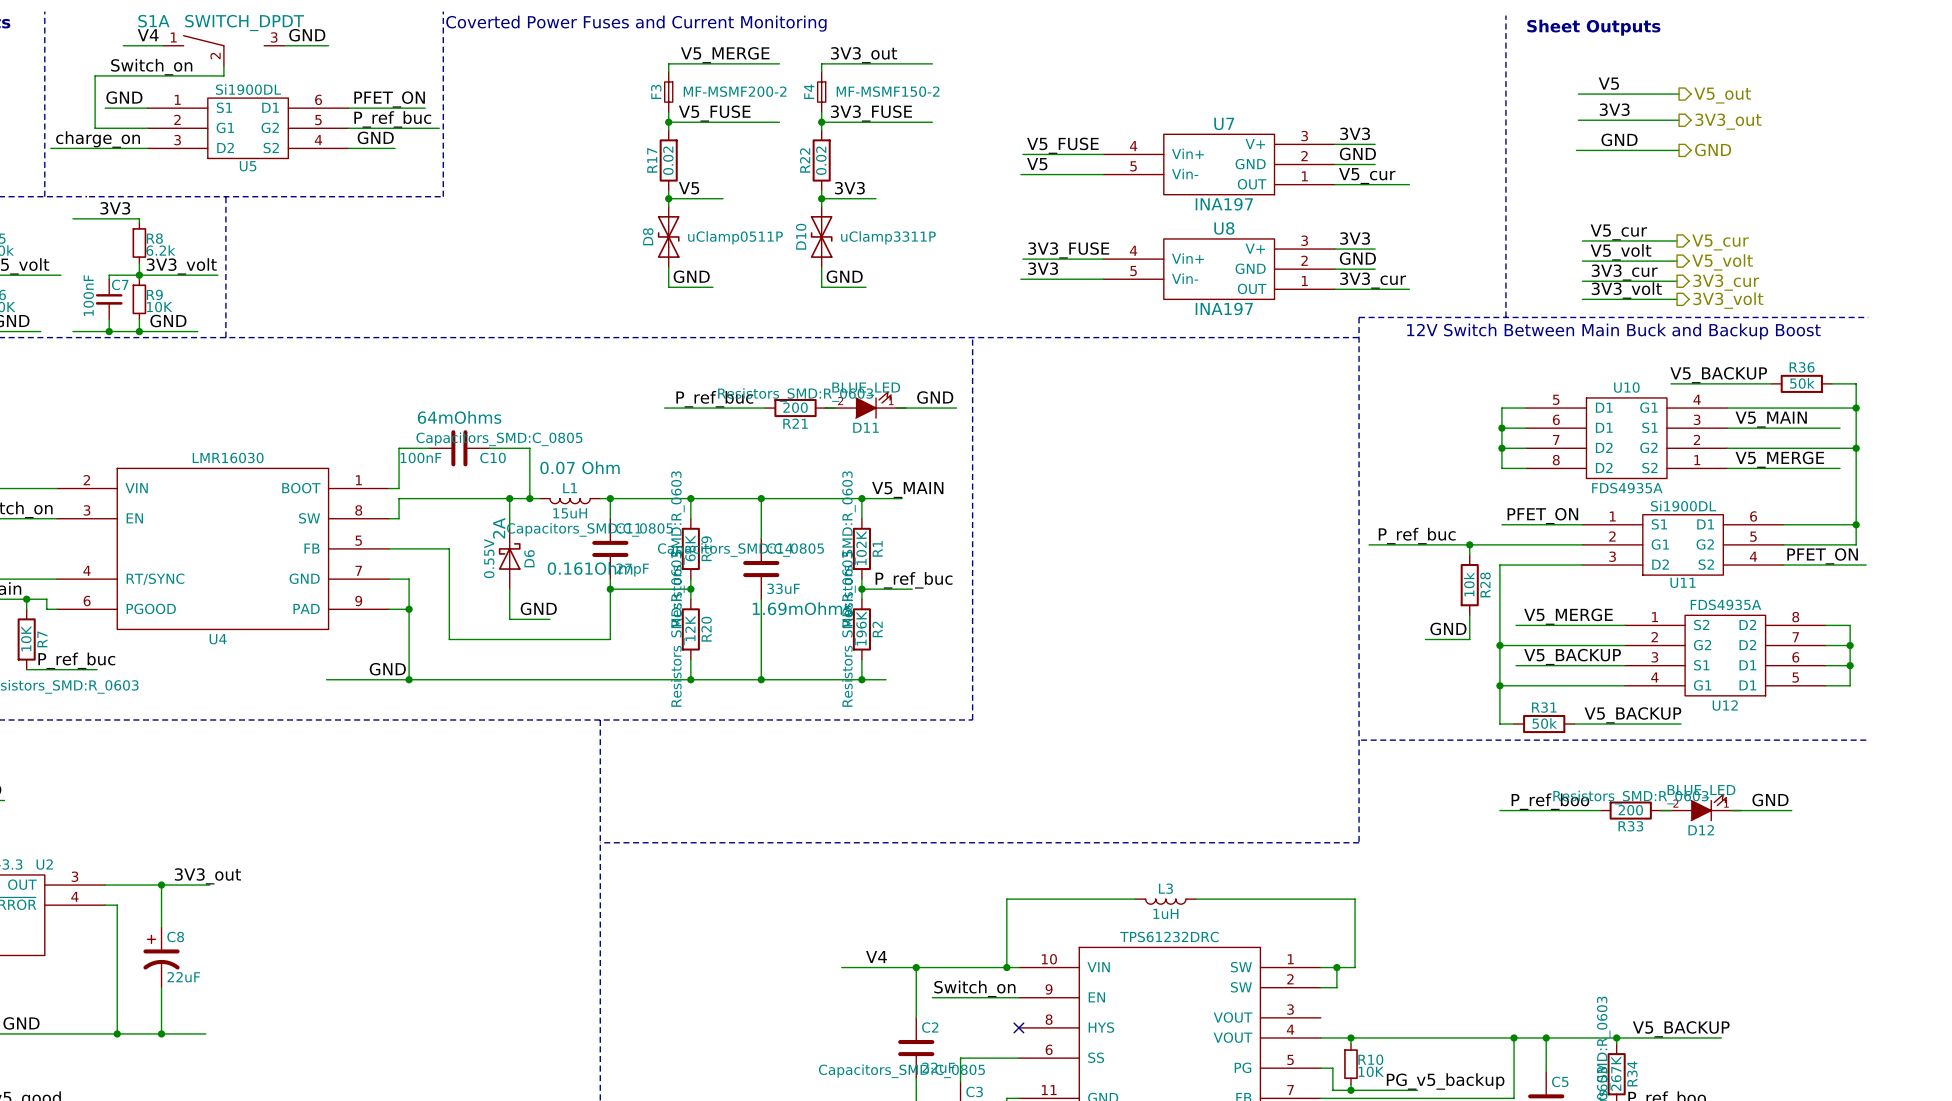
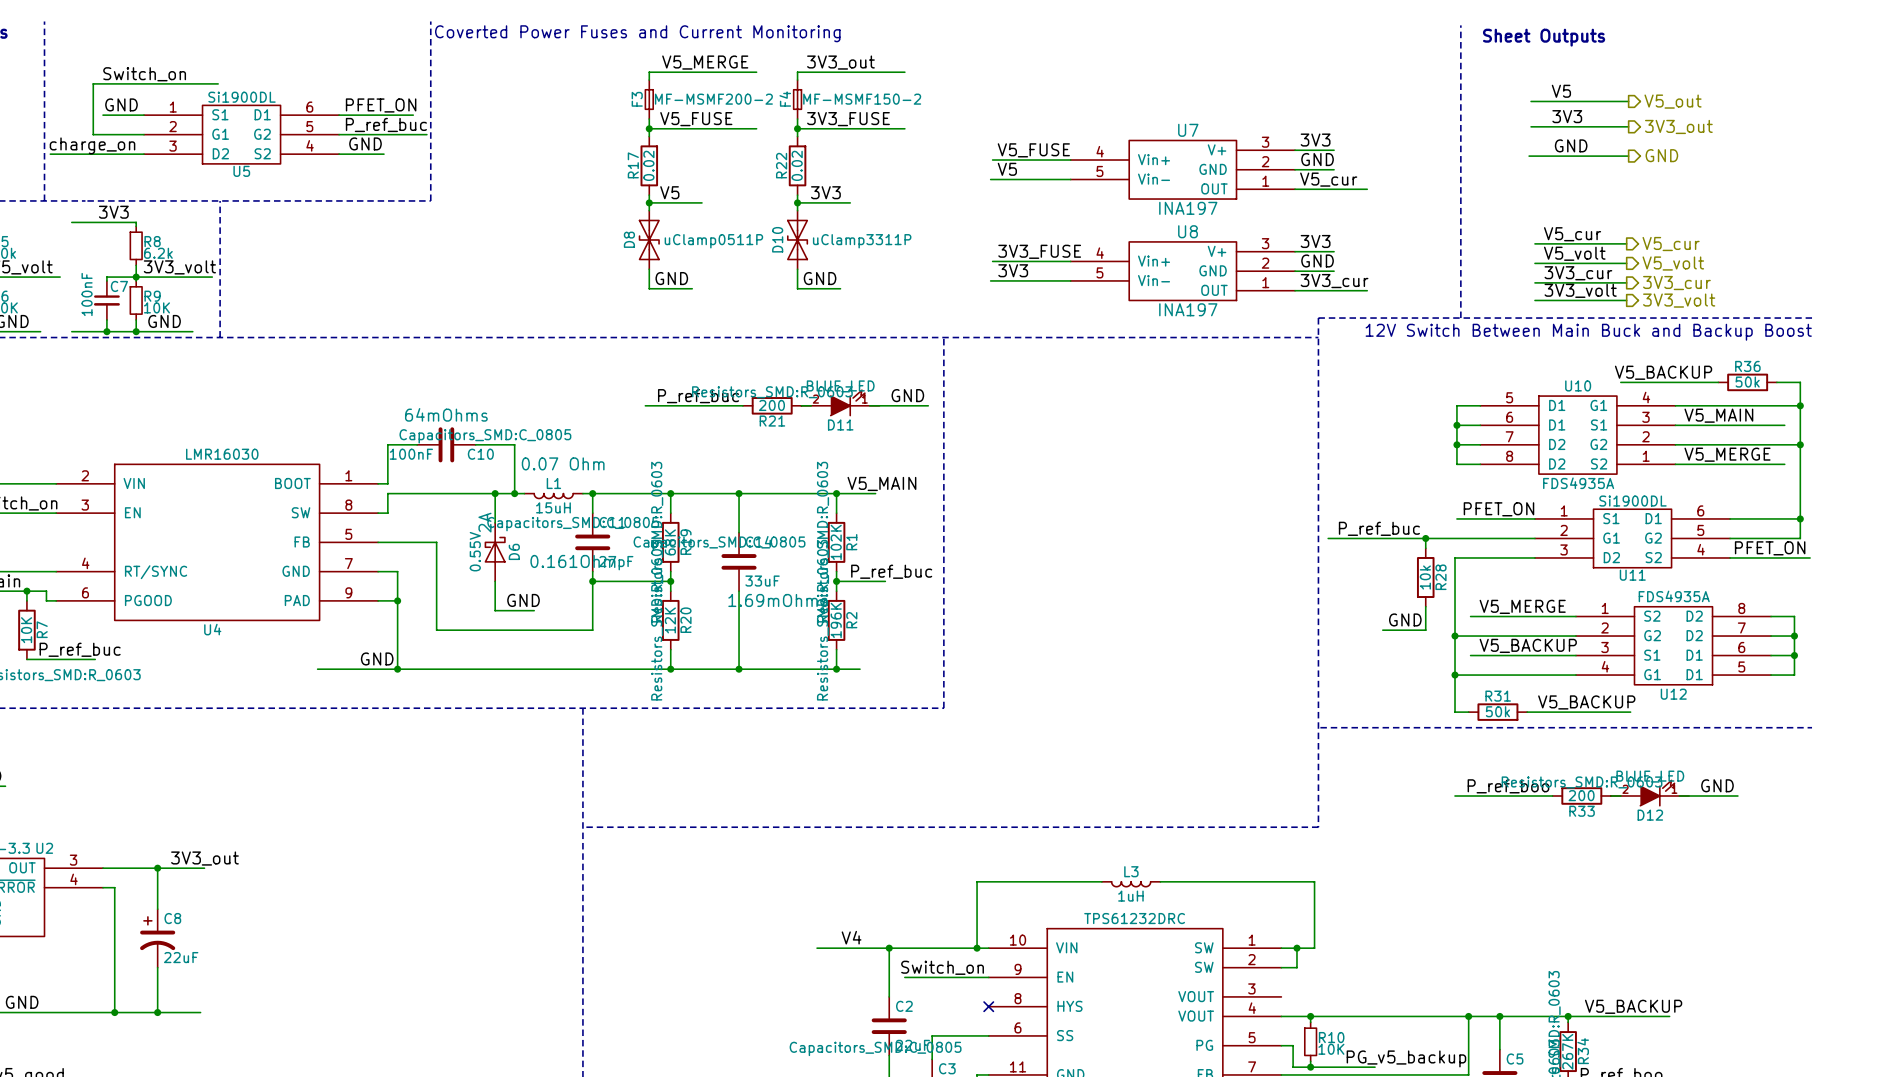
label: V4 (148, 35) -> none
label: GND (307, 35) -> none
wire: (123, 45) (163, 45) -> none
wire: (284, 45) (328, 45) -> none
S1A: SWITCH_DPDT (223, 50) -> none
wire: (223, 65) (223, 75) -> none

